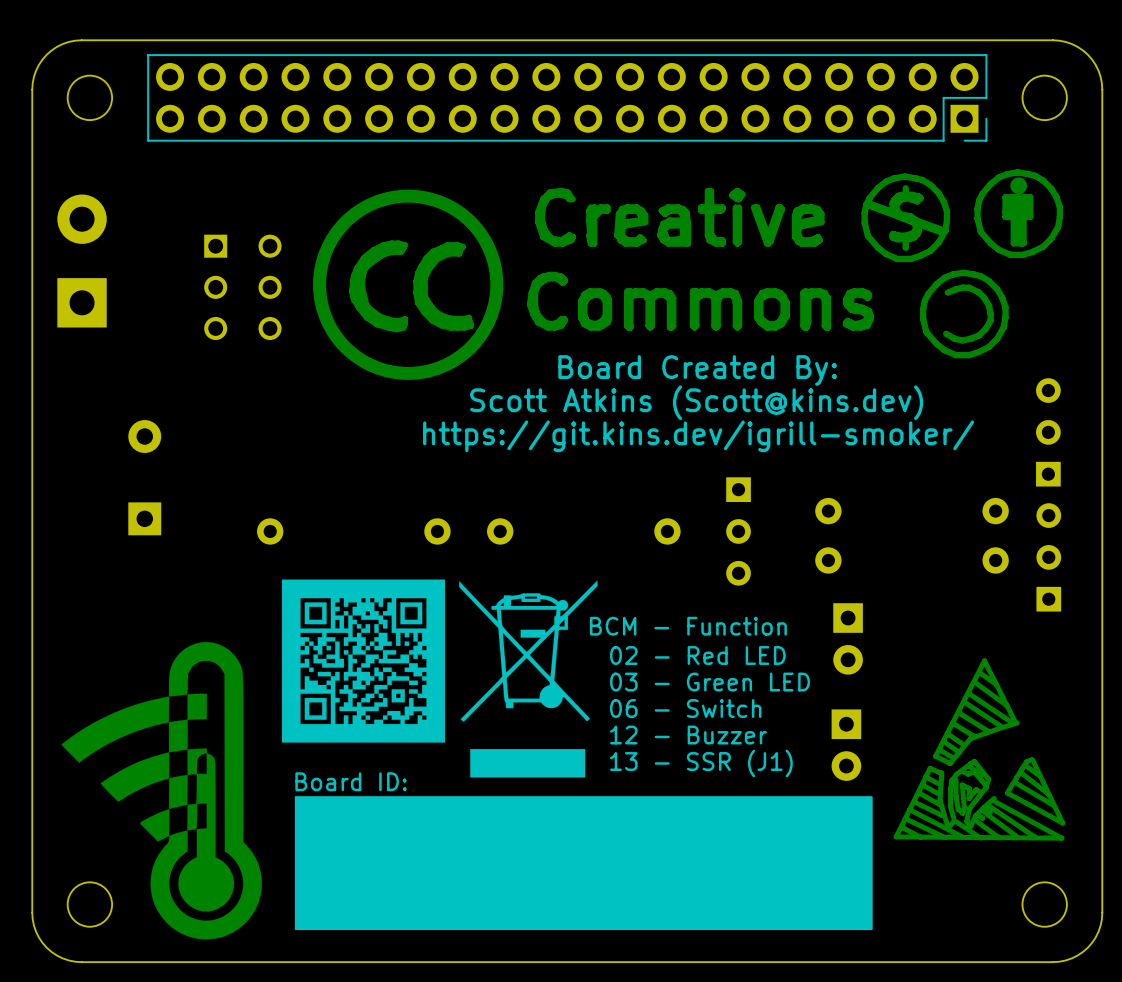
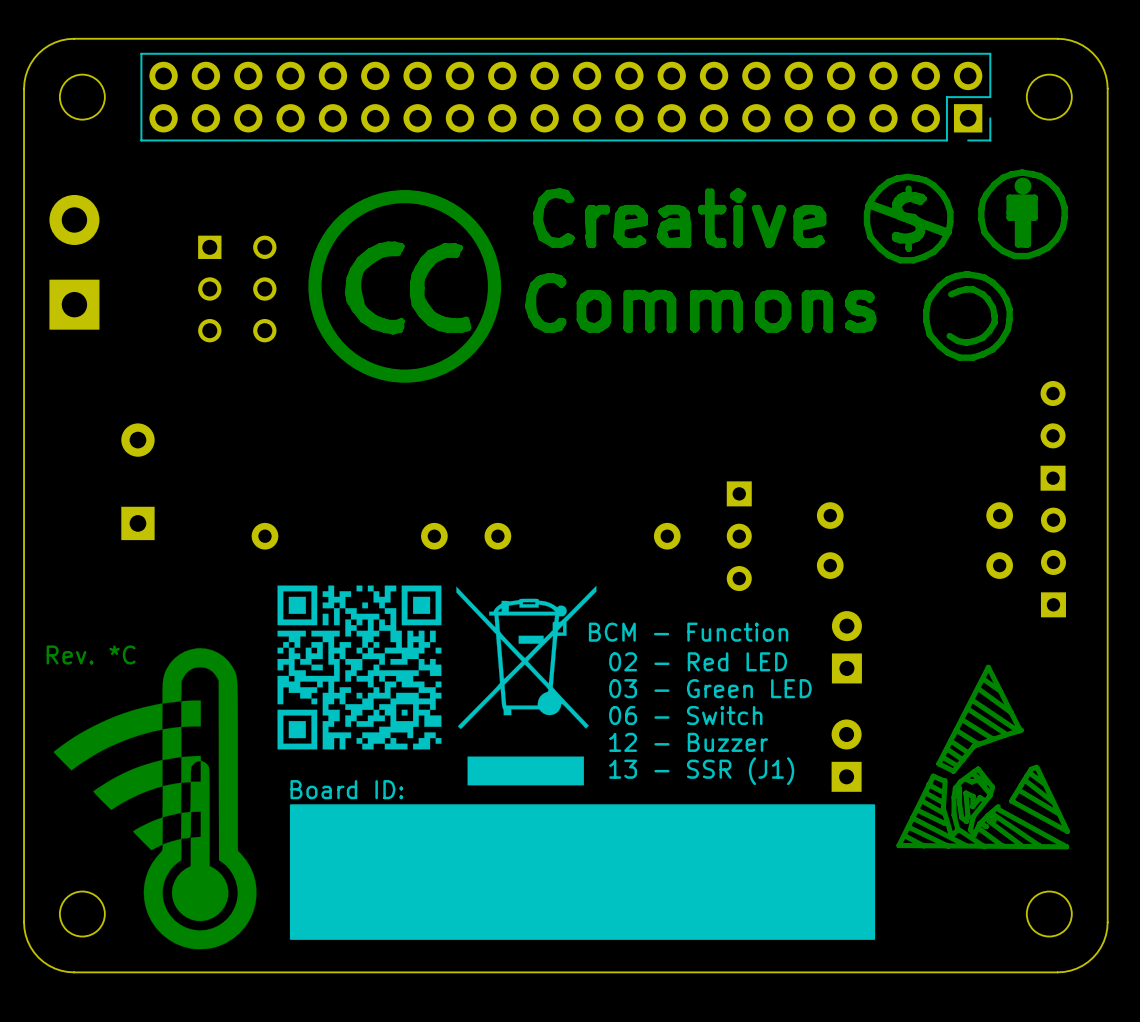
text: Board Created By: (697, 370) -> none
text: Scott Atkins (Scott@kins.dev) (696, 402) -> none
text: https://git.kins.dev/igrill-smoker/ (698, 436) -> none
drawing shape: [281, 579, 446, 743] -> [277, 585, 442, 750]
part rotation: 0° (848, 638) -> 180° (846, 647)
text: none -> Rev. *C (91, 654)
part rotation: 0° (846, 745) -> 180° (846, 755)

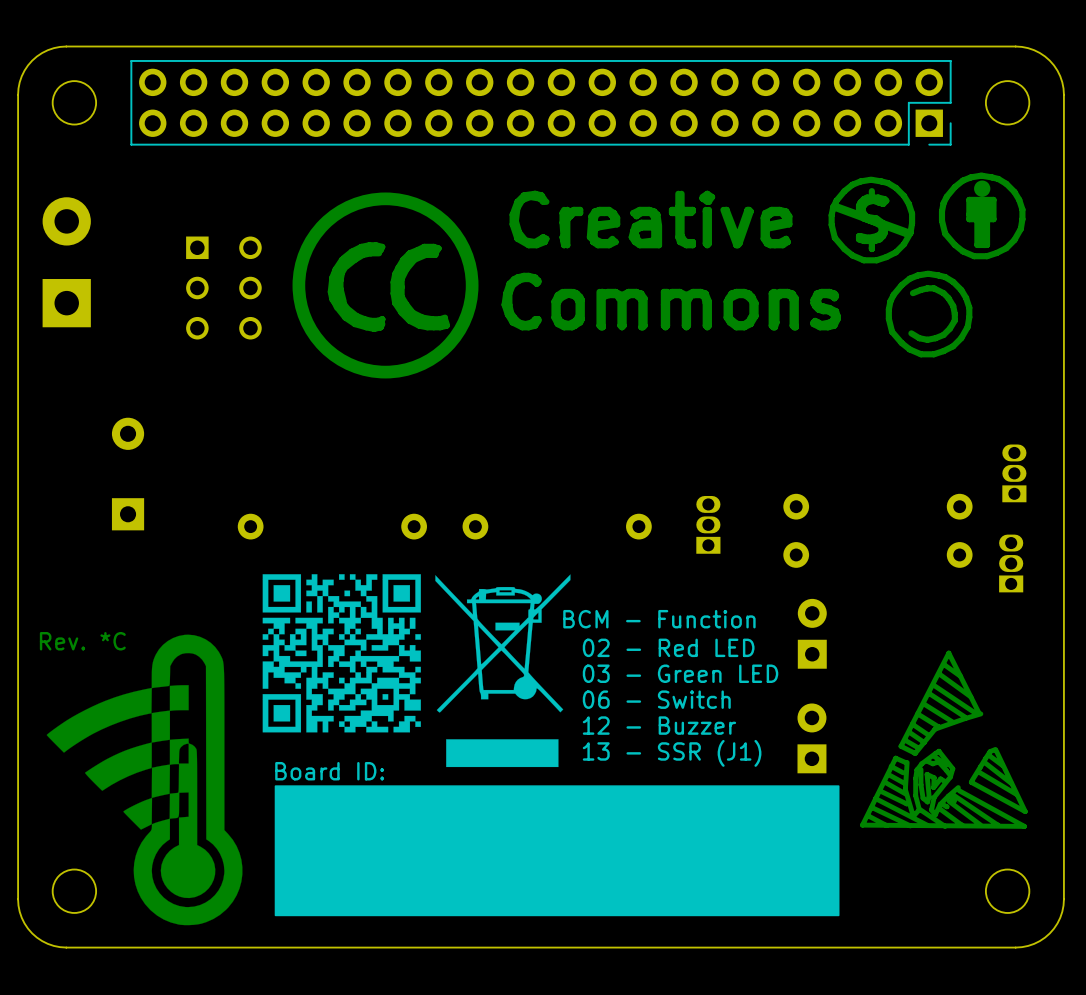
part: (1053, 435) -> none
part footprint: [726, 481, 752, 592] -> [696, 495, 721, 554]
part: none -> (1014, 473)
part footprint: [1040, 507, 1066, 618] -> [999, 534, 1024, 593]

